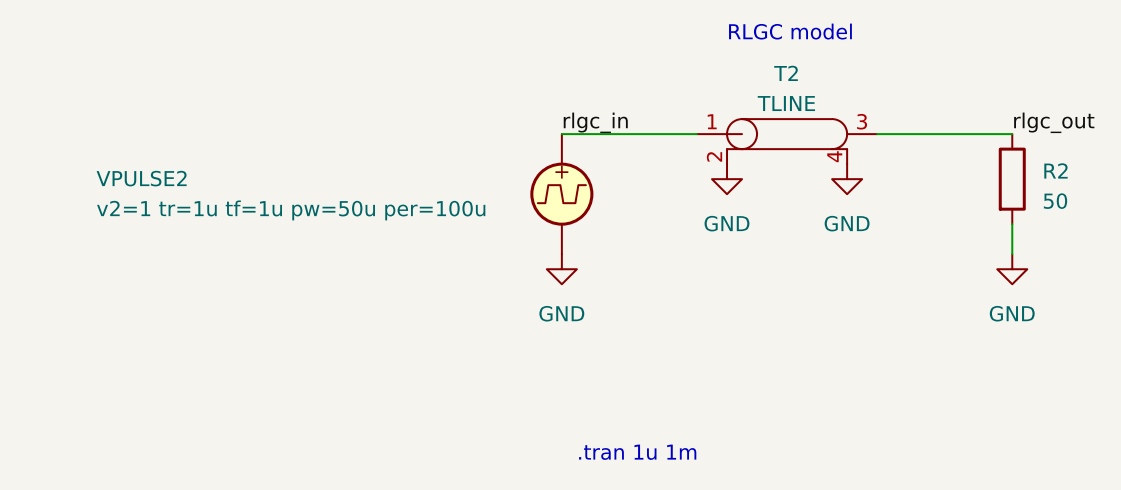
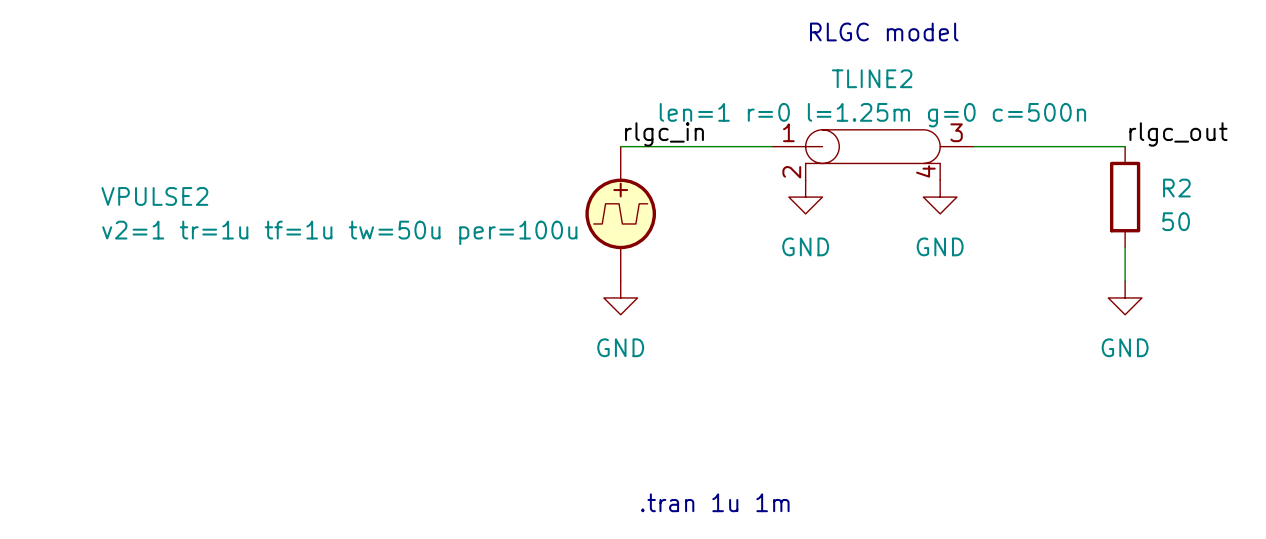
T2 name: T2 (786, 73) -> TLINE2 (872, 78)
T2 value: TLINE (786, 103) -> len=1 r=0 l=1.25m g=0 c=500n (872, 115)
VPULSE2 value: v2=1 tr=1u tf=1u pw=50u per=100u (291, 210) -> v2=1 tr=1u tf=1u tw=50u per=100u (339, 232)

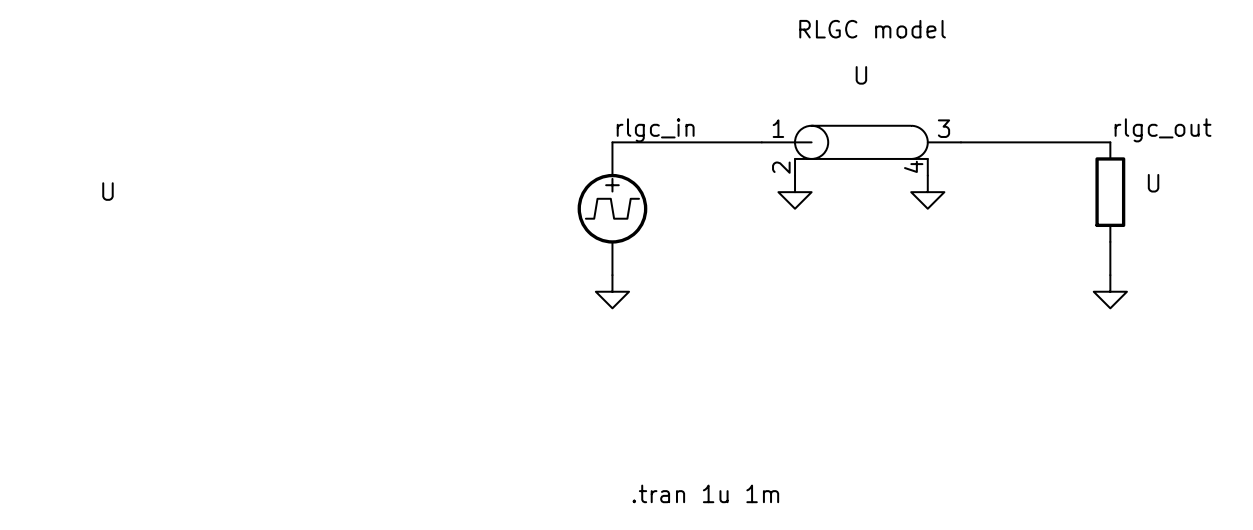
TLINE2 name: TLINE2 (872, 78) -> U (861, 75)
TLINE2 value: len=1 r=0 l=1.25m g=0 c=500n (872, 115) -> none
R2 name: R2 (1176, 188) -> U (1153, 183)
VPULSE2 name: VPULSE2 (154, 196) -> U (107, 191)
R2 value: 50 (1176, 221) -> none
VPULSE2 value: v2=1 tr=1u tf=1u tw=50u per=100u (339, 232) -> none
power symbol text: GND (805, 246) -> none
power symbol text: GND (940, 246) -> none
power symbol text: GND (620, 347) -> none
power symbol text: GND (1125, 347) -> none

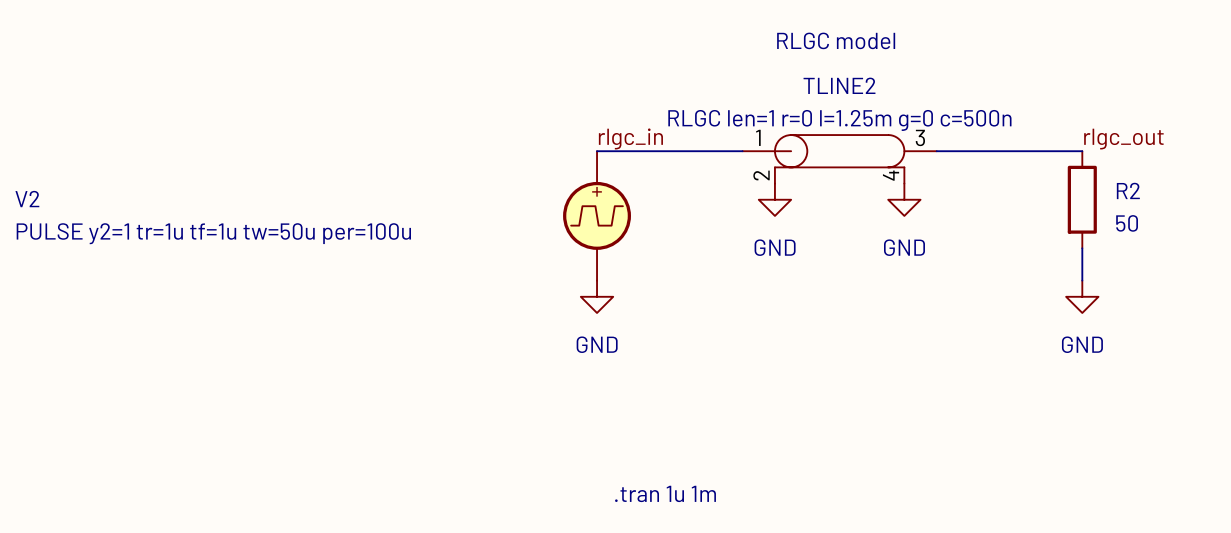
U name: U (861, 75) -> TLINE2 (839, 85)
U value: none -> RLGC len=1 r=0 l=1.25m g=0 c=500n (839, 120)
U name: U (1153, 183) -> R2 (1128, 190)
U name: U (107, 191) -> V2 (27, 199)
U value: none -> 50 (1127, 223)
U value: none -> PULSE y2=1 tr=1u tf=1u tw=50u per=100u (213, 233)
power symbol text: none -> GND (775, 247)
power symbol text: none -> GND (904, 247)
power symbol text: none -> GND (597, 344)
power symbol text: none -> GND (1082, 344)

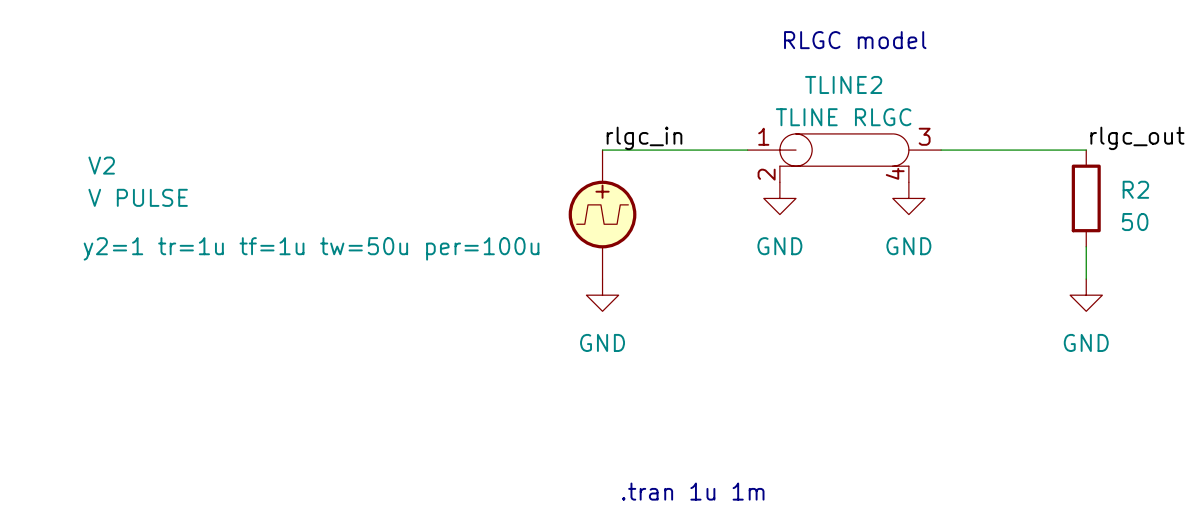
TLINE2 value: RLGC len=1 r=0 l=1.25m g=0 c=500n (839, 120) -> TLINE RLGC (843, 117)
V2 name position: V2 (27, 199) -> V2 (101, 165)
V2 value: PULSE y2=1 tr=1u tf=1u tw=50u per=100u (213, 233) -> V PULSE (138, 197)
V2 text: none -> y2=1 tr=1u tf=1u tw=50u per=100u (311, 248)

